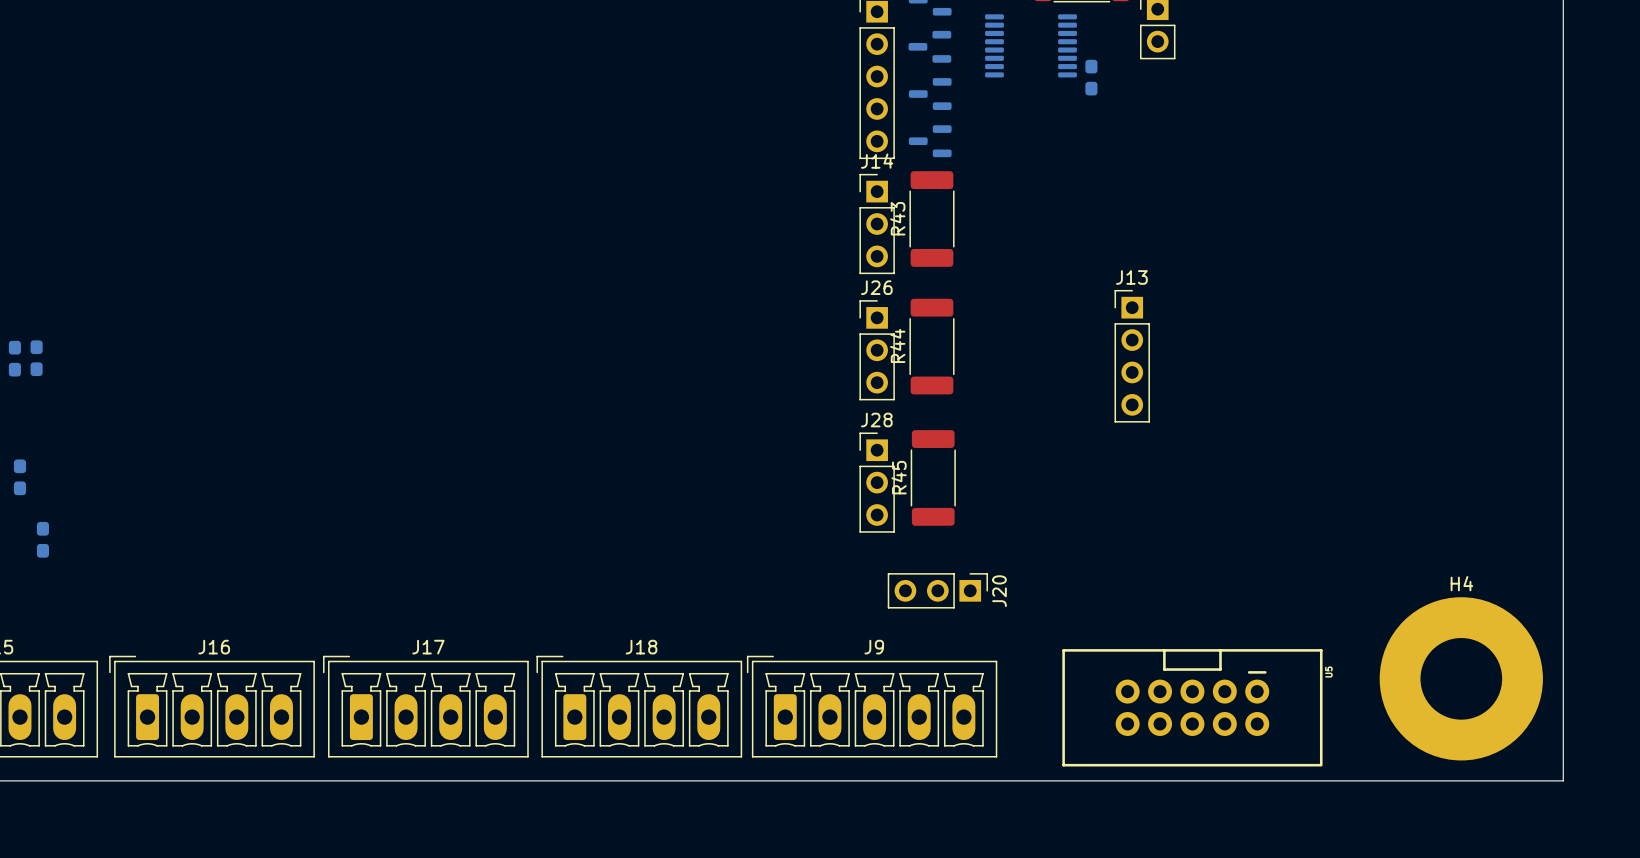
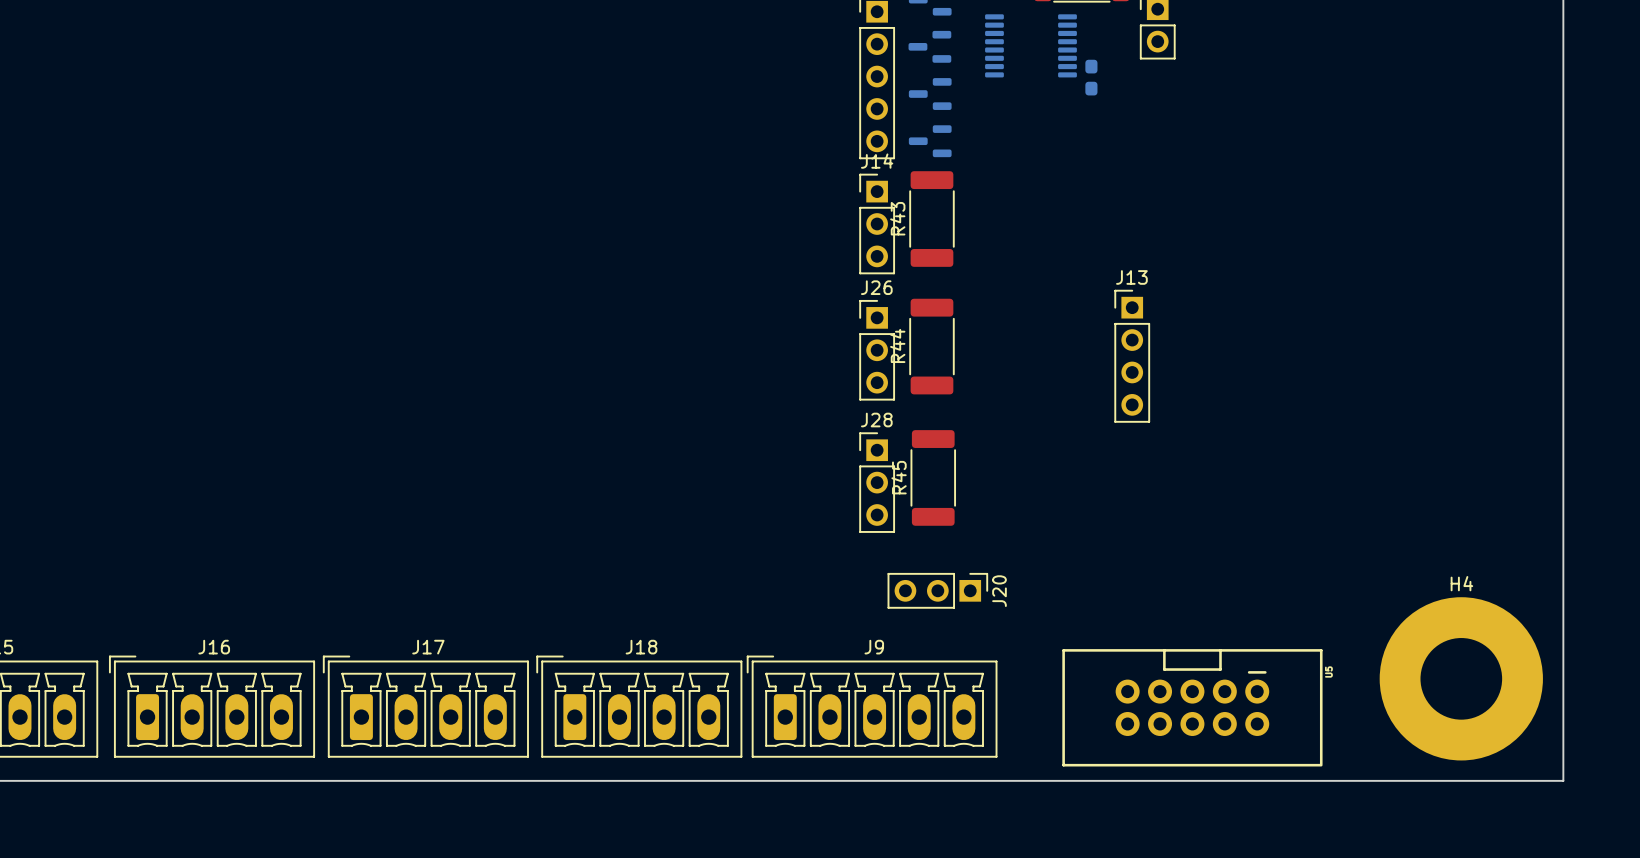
part: (14, 358) -> none
part: (36, 358) -> none
part: (19, 477) -> none
part: (42, 539) -> none

